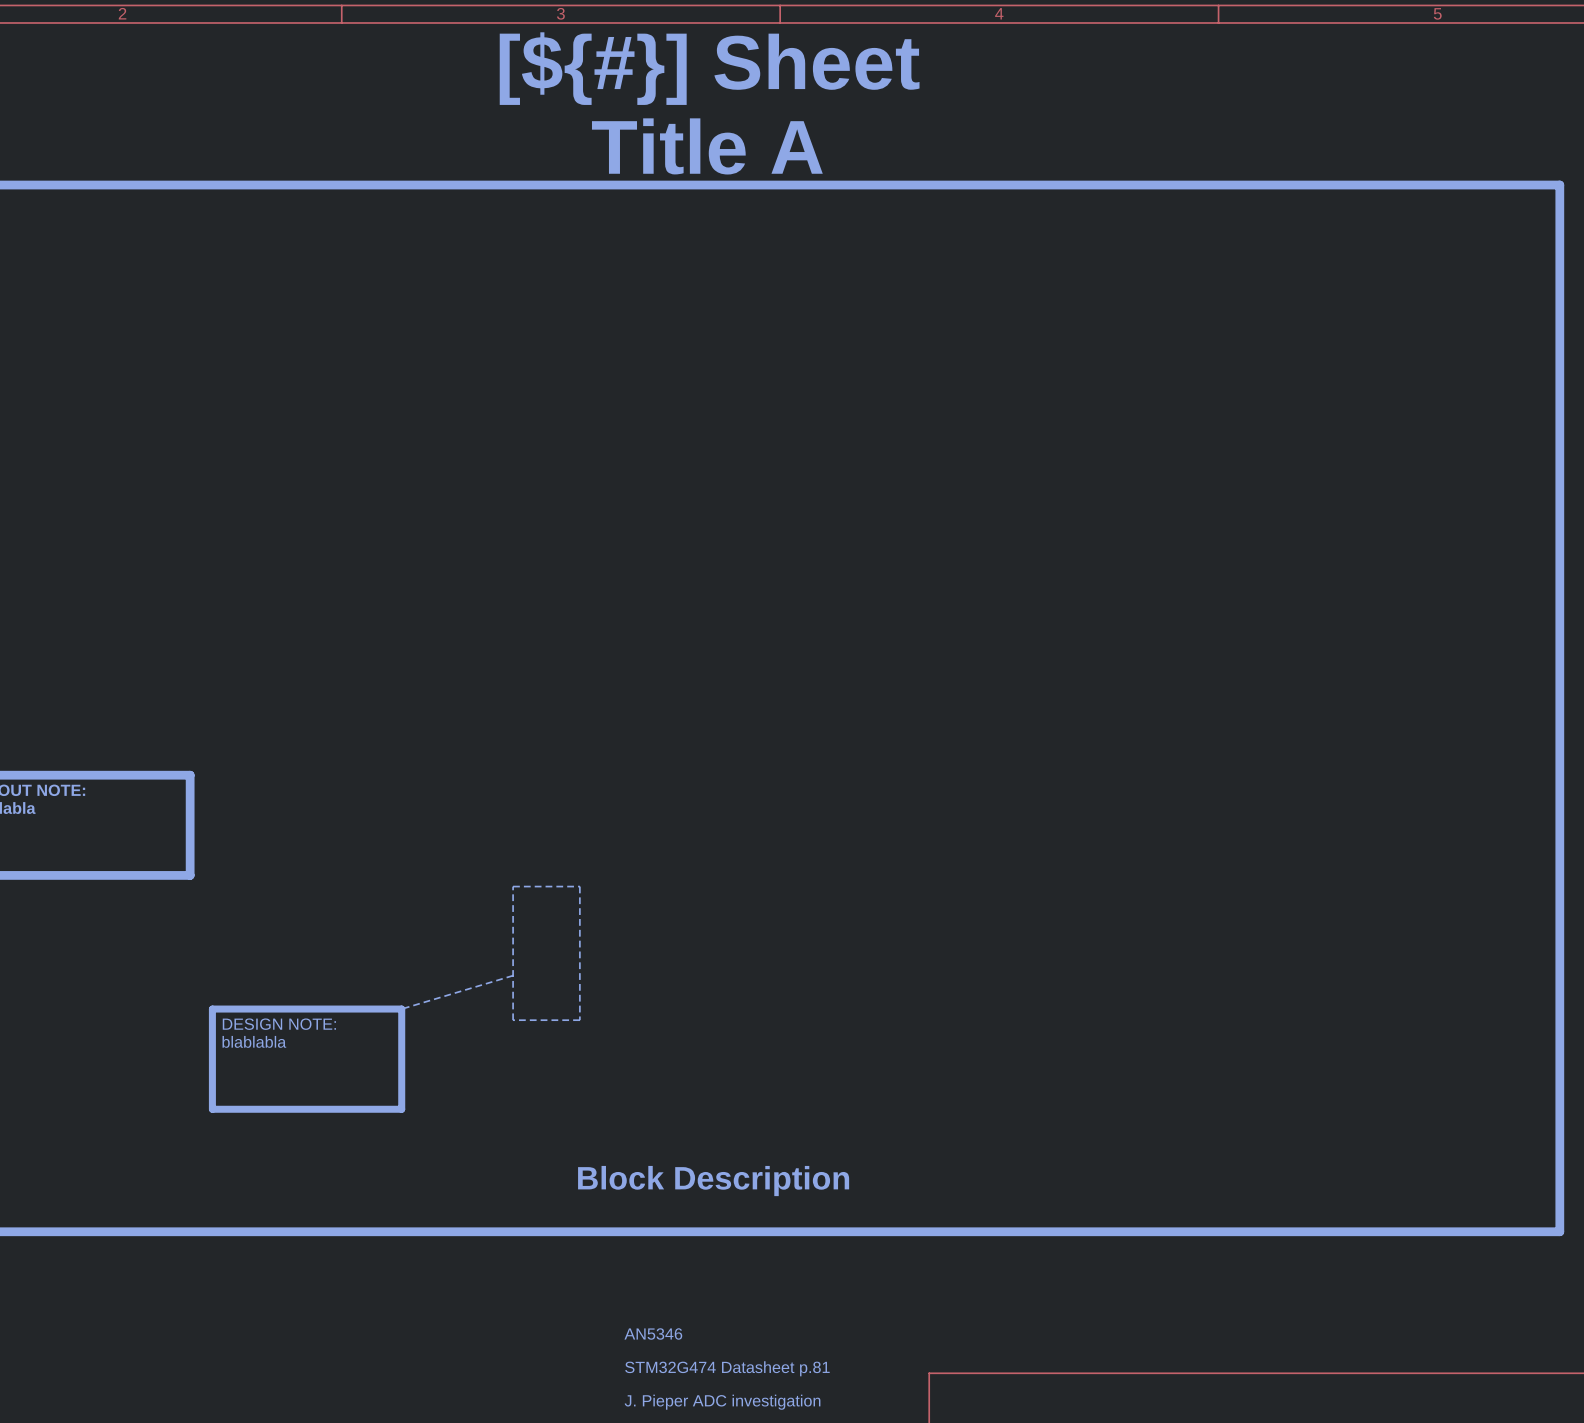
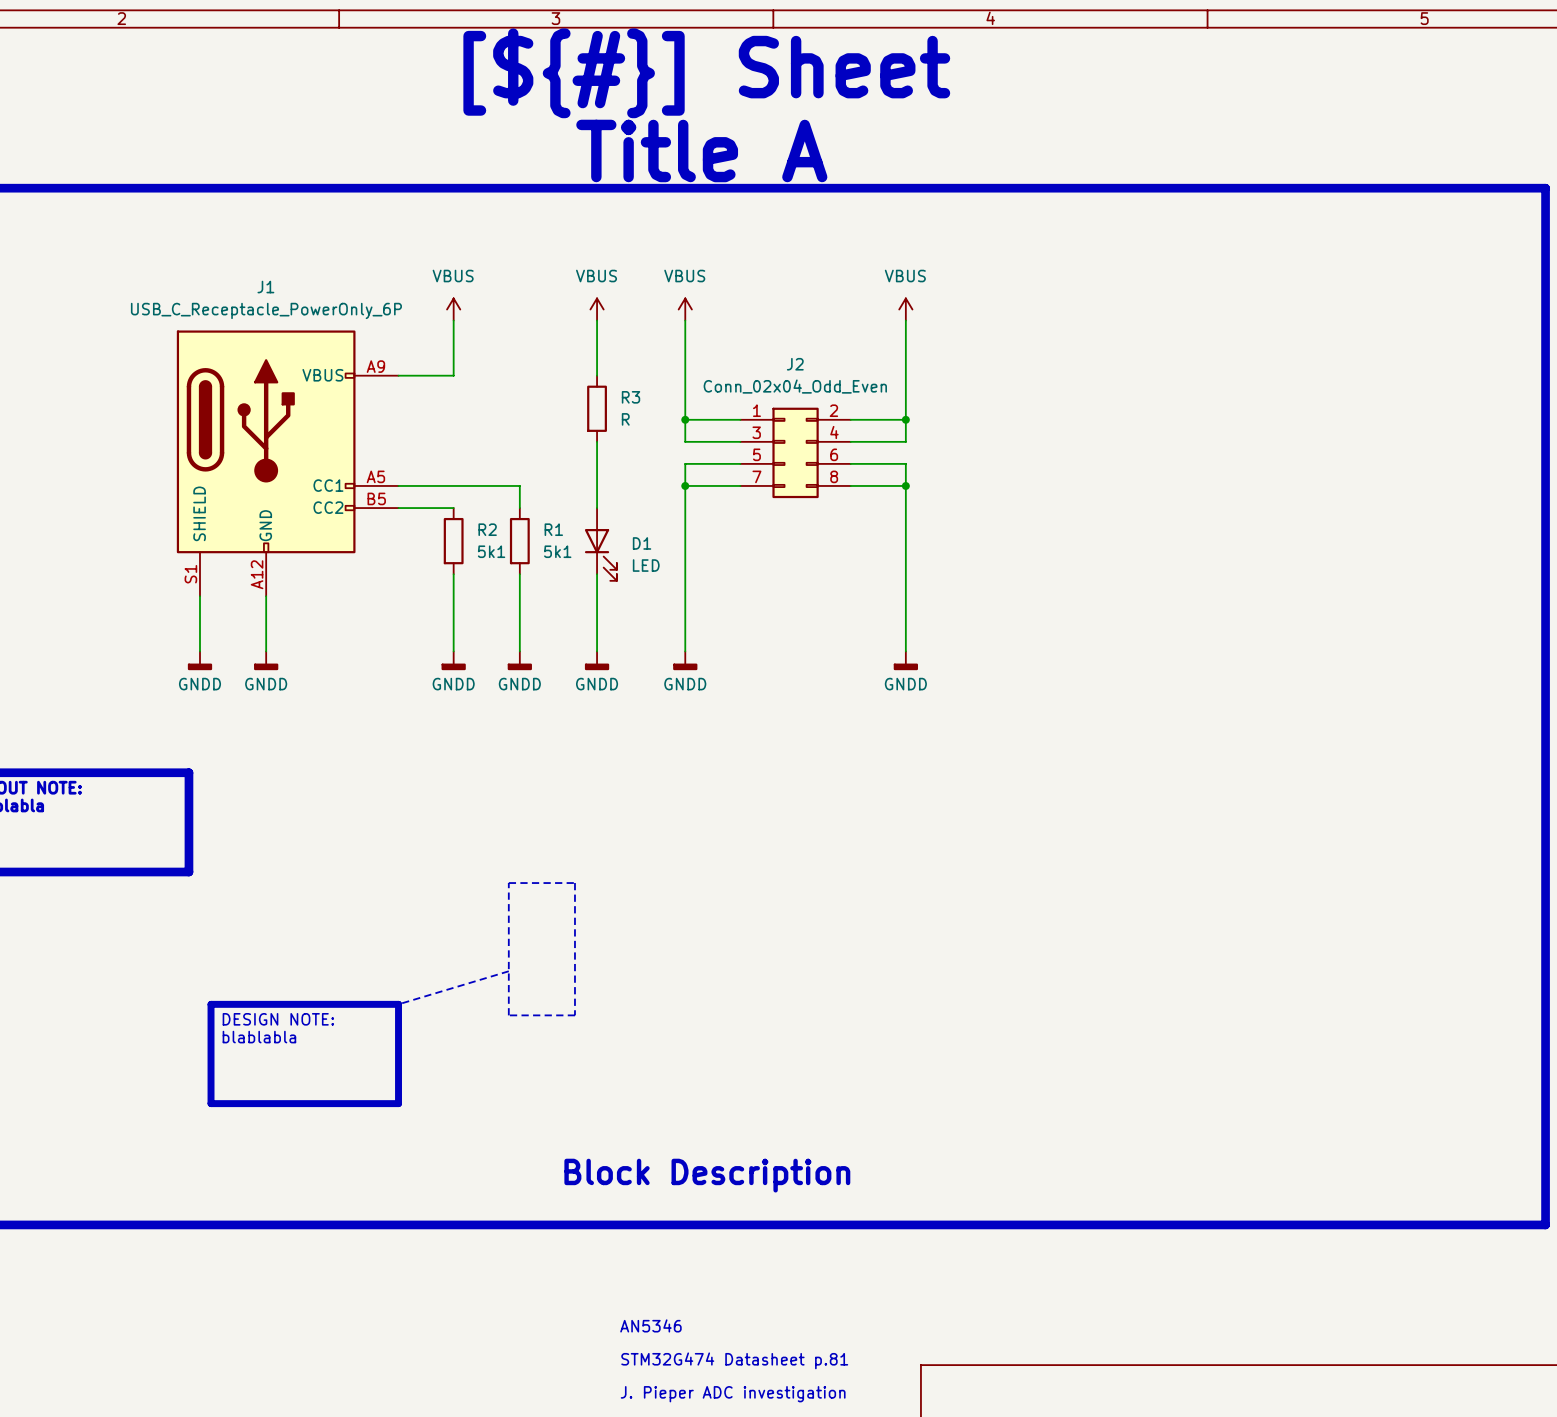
power symbol: none -> VBUS (453, 309)
power symbol: none -> VBUS (597, 309)
power symbol: none -> VBUS (685, 309)
power symbol: none -> VBUS (905, 309)
wire: none -> (453, 320) (453, 375) (398, 375)
wire: none -> (597, 320) (597, 375)
wire: none -> (685, 320) (685, 441) (740, 441)
wire: none -> (905, 320) (905, 441) (850, 441)
R3: none -> R (597, 408)
wire: none -> (685, 419) (740, 419)
junction: none -> (685, 419)
wire: none -> (850, 419) (905, 419)
junction: none -> (905, 419)
wire: none -> (597, 441) (597, 508)
J2: none -> Conn_02x04_Odd_Even (795, 452)
J1: none -> USB_C_Receptacle_PowerOnly_6P (287, 463)
wire: none -> (740, 463) (685, 463) (685, 651)
wire: none -> (850, 463) (905, 463) (905, 651)
wire: none -> (398, 485) (519, 485) (519, 508)
wire: none -> (685, 485) (740, 485)
junction: none -> (685, 485)
wire: none -> (850, 485) (905, 485)
junction: none -> (905, 485)
wire: none -> (398, 508) (453, 508)
R2: none -> 5k1 (453, 541)
R1: none -> 5k1 (519, 541)
D1: none -> LED (600, 544)
wire: none -> (453, 574) (453, 651)
wire: none -> (519, 574) (519, 651)
wire: none -> (597, 574) (597, 651)
wire: none -> (199, 596) (199, 651)
wire: none -> (266, 596) (266, 651)
power symbol: none -> GNDD (199, 660)
power symbol: none -> GNDD (266, 660)
power symbol: none -> GNDD (453, 660)
power symbol: none -> GNDD (519, 660)
power symbol: none -> GNDD (597, 660)
power symbol: none -> GNDD (685, 660)
power symbol: none -> GNDD (905, 660)

